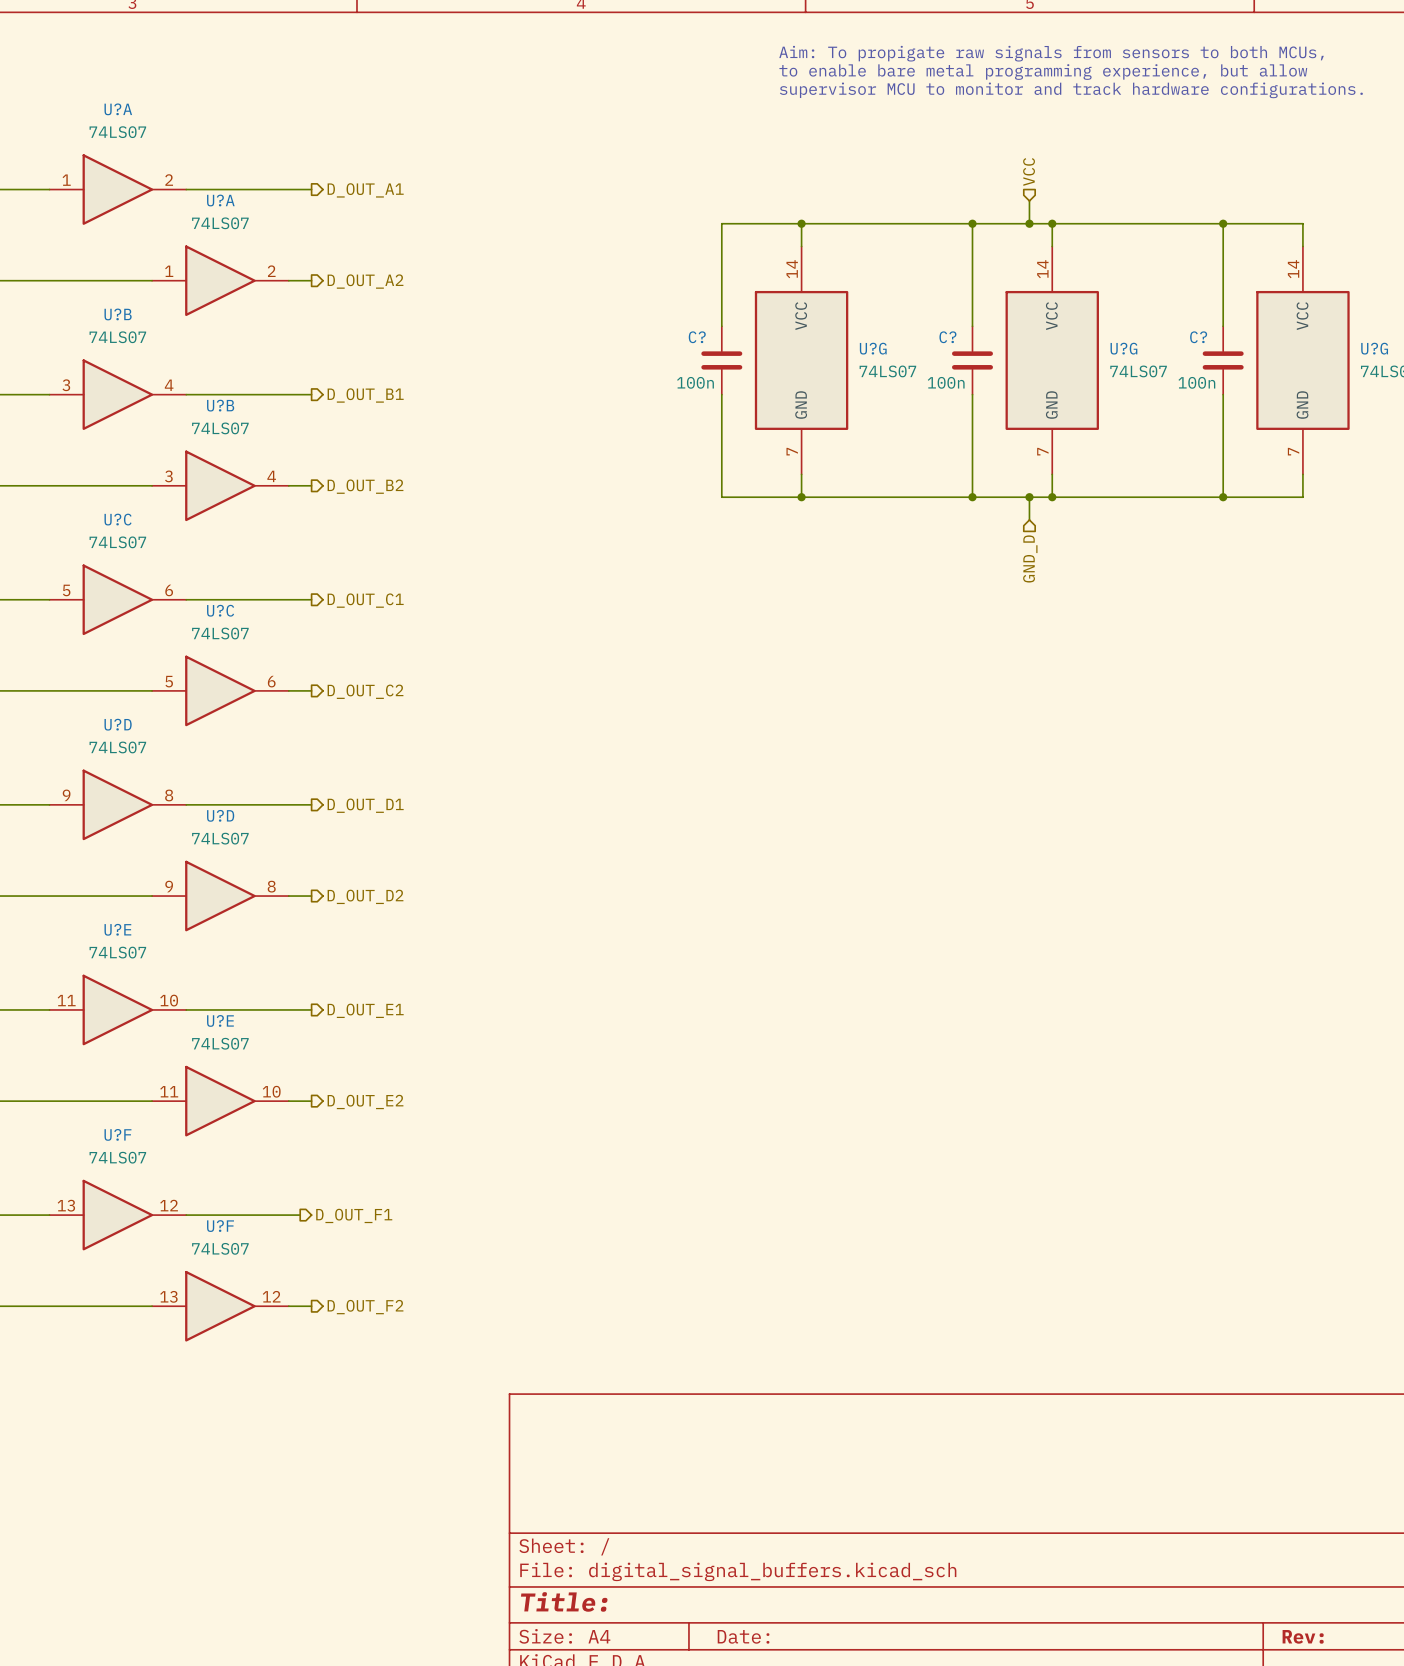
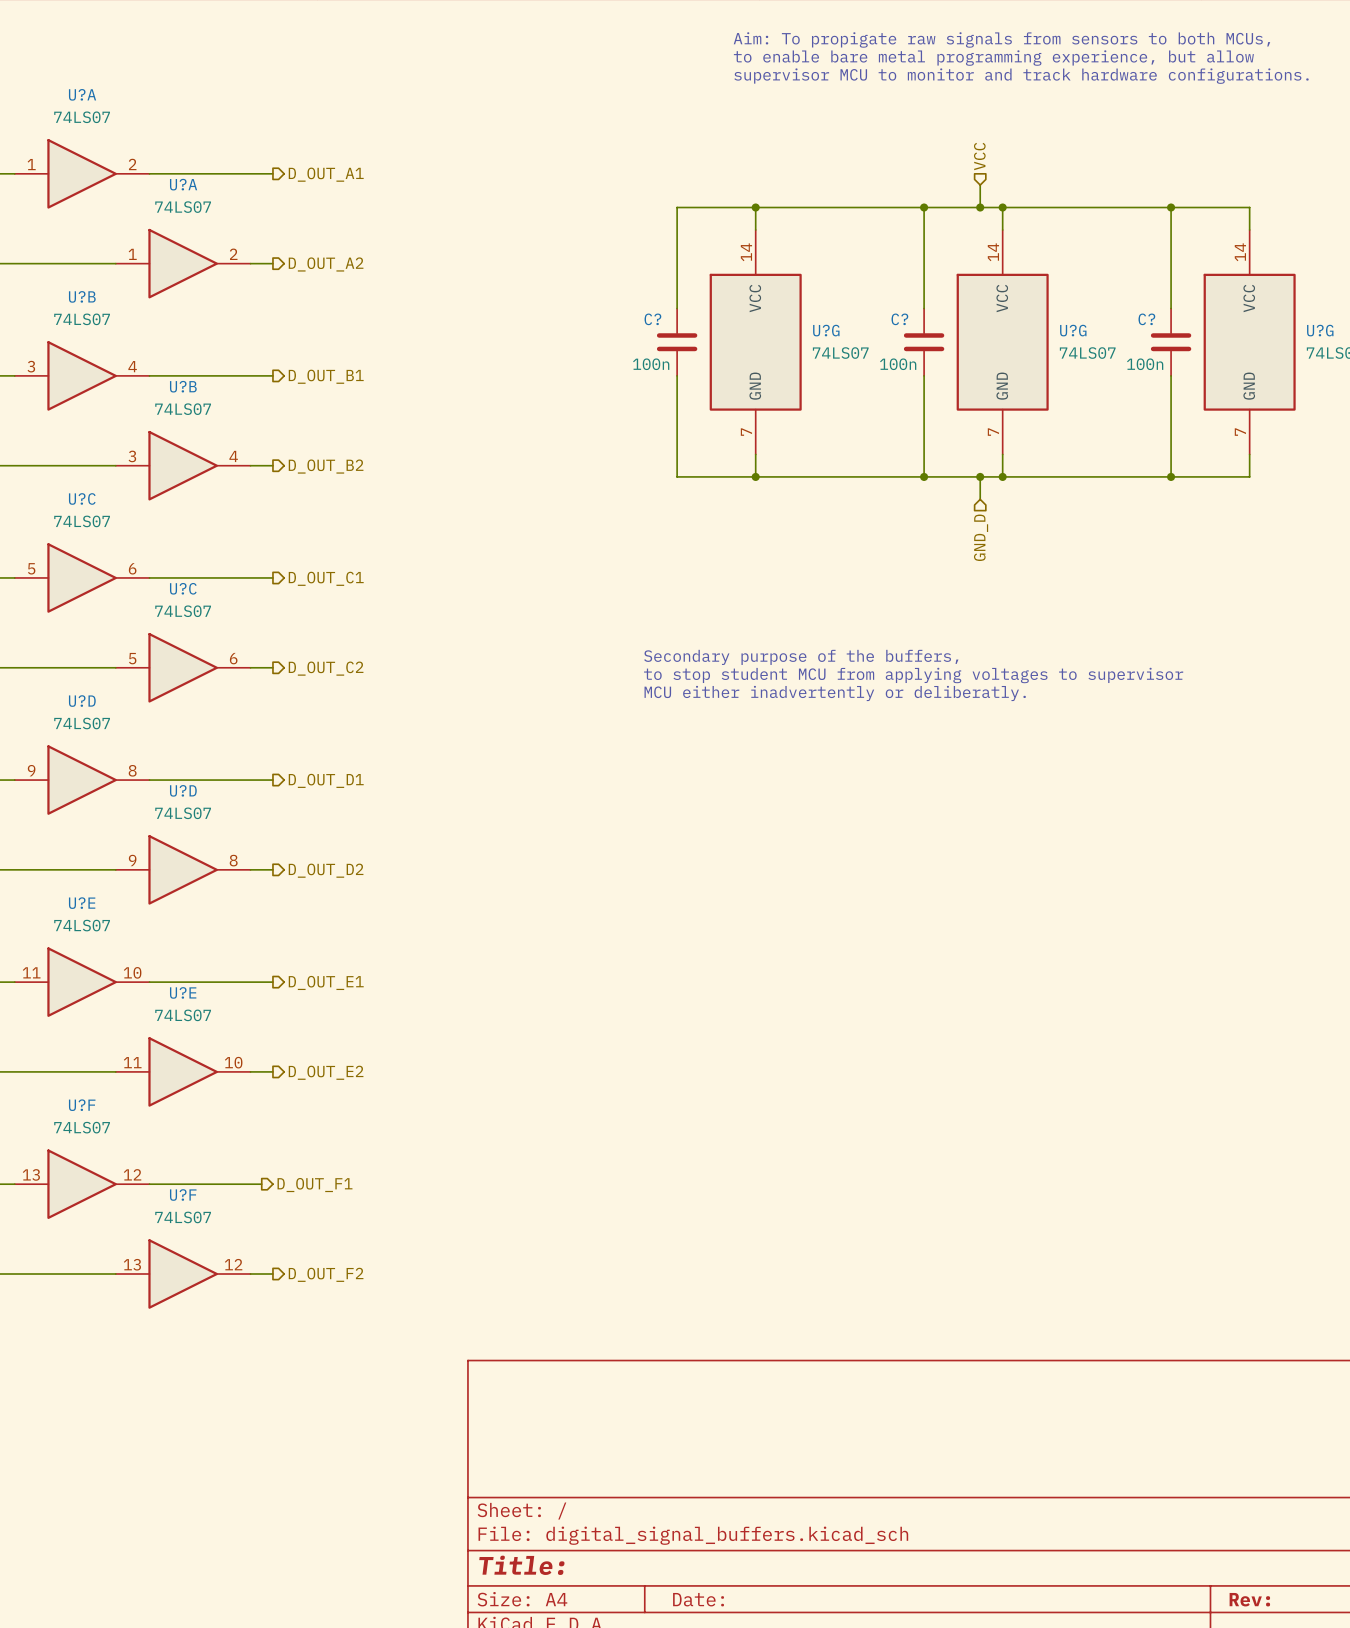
text: none -> Secondary purpose of the buffers, (801, 657)
text: none -> to stop student MCU from applying voltages to supervisor (913, 675)
text: none -> MCU either inadvertently or deliberatly. (835, 693)

